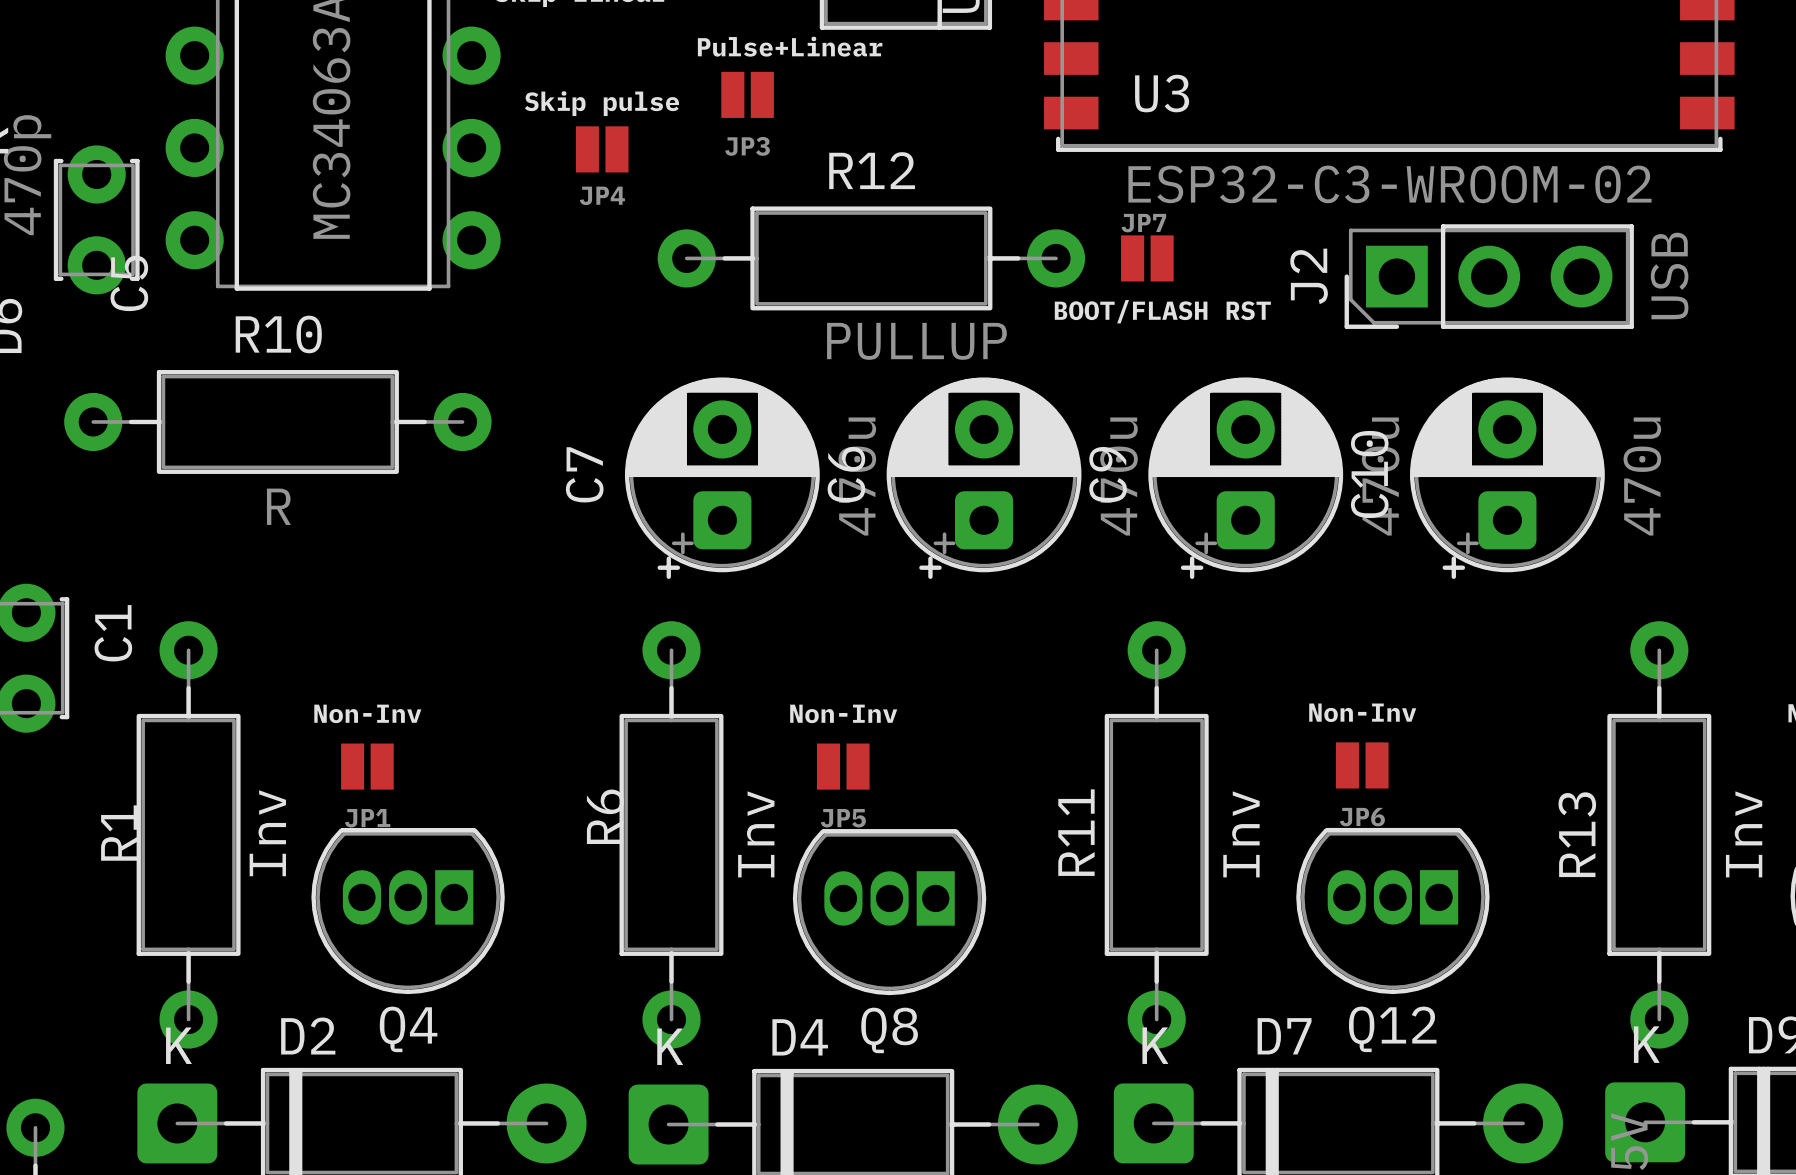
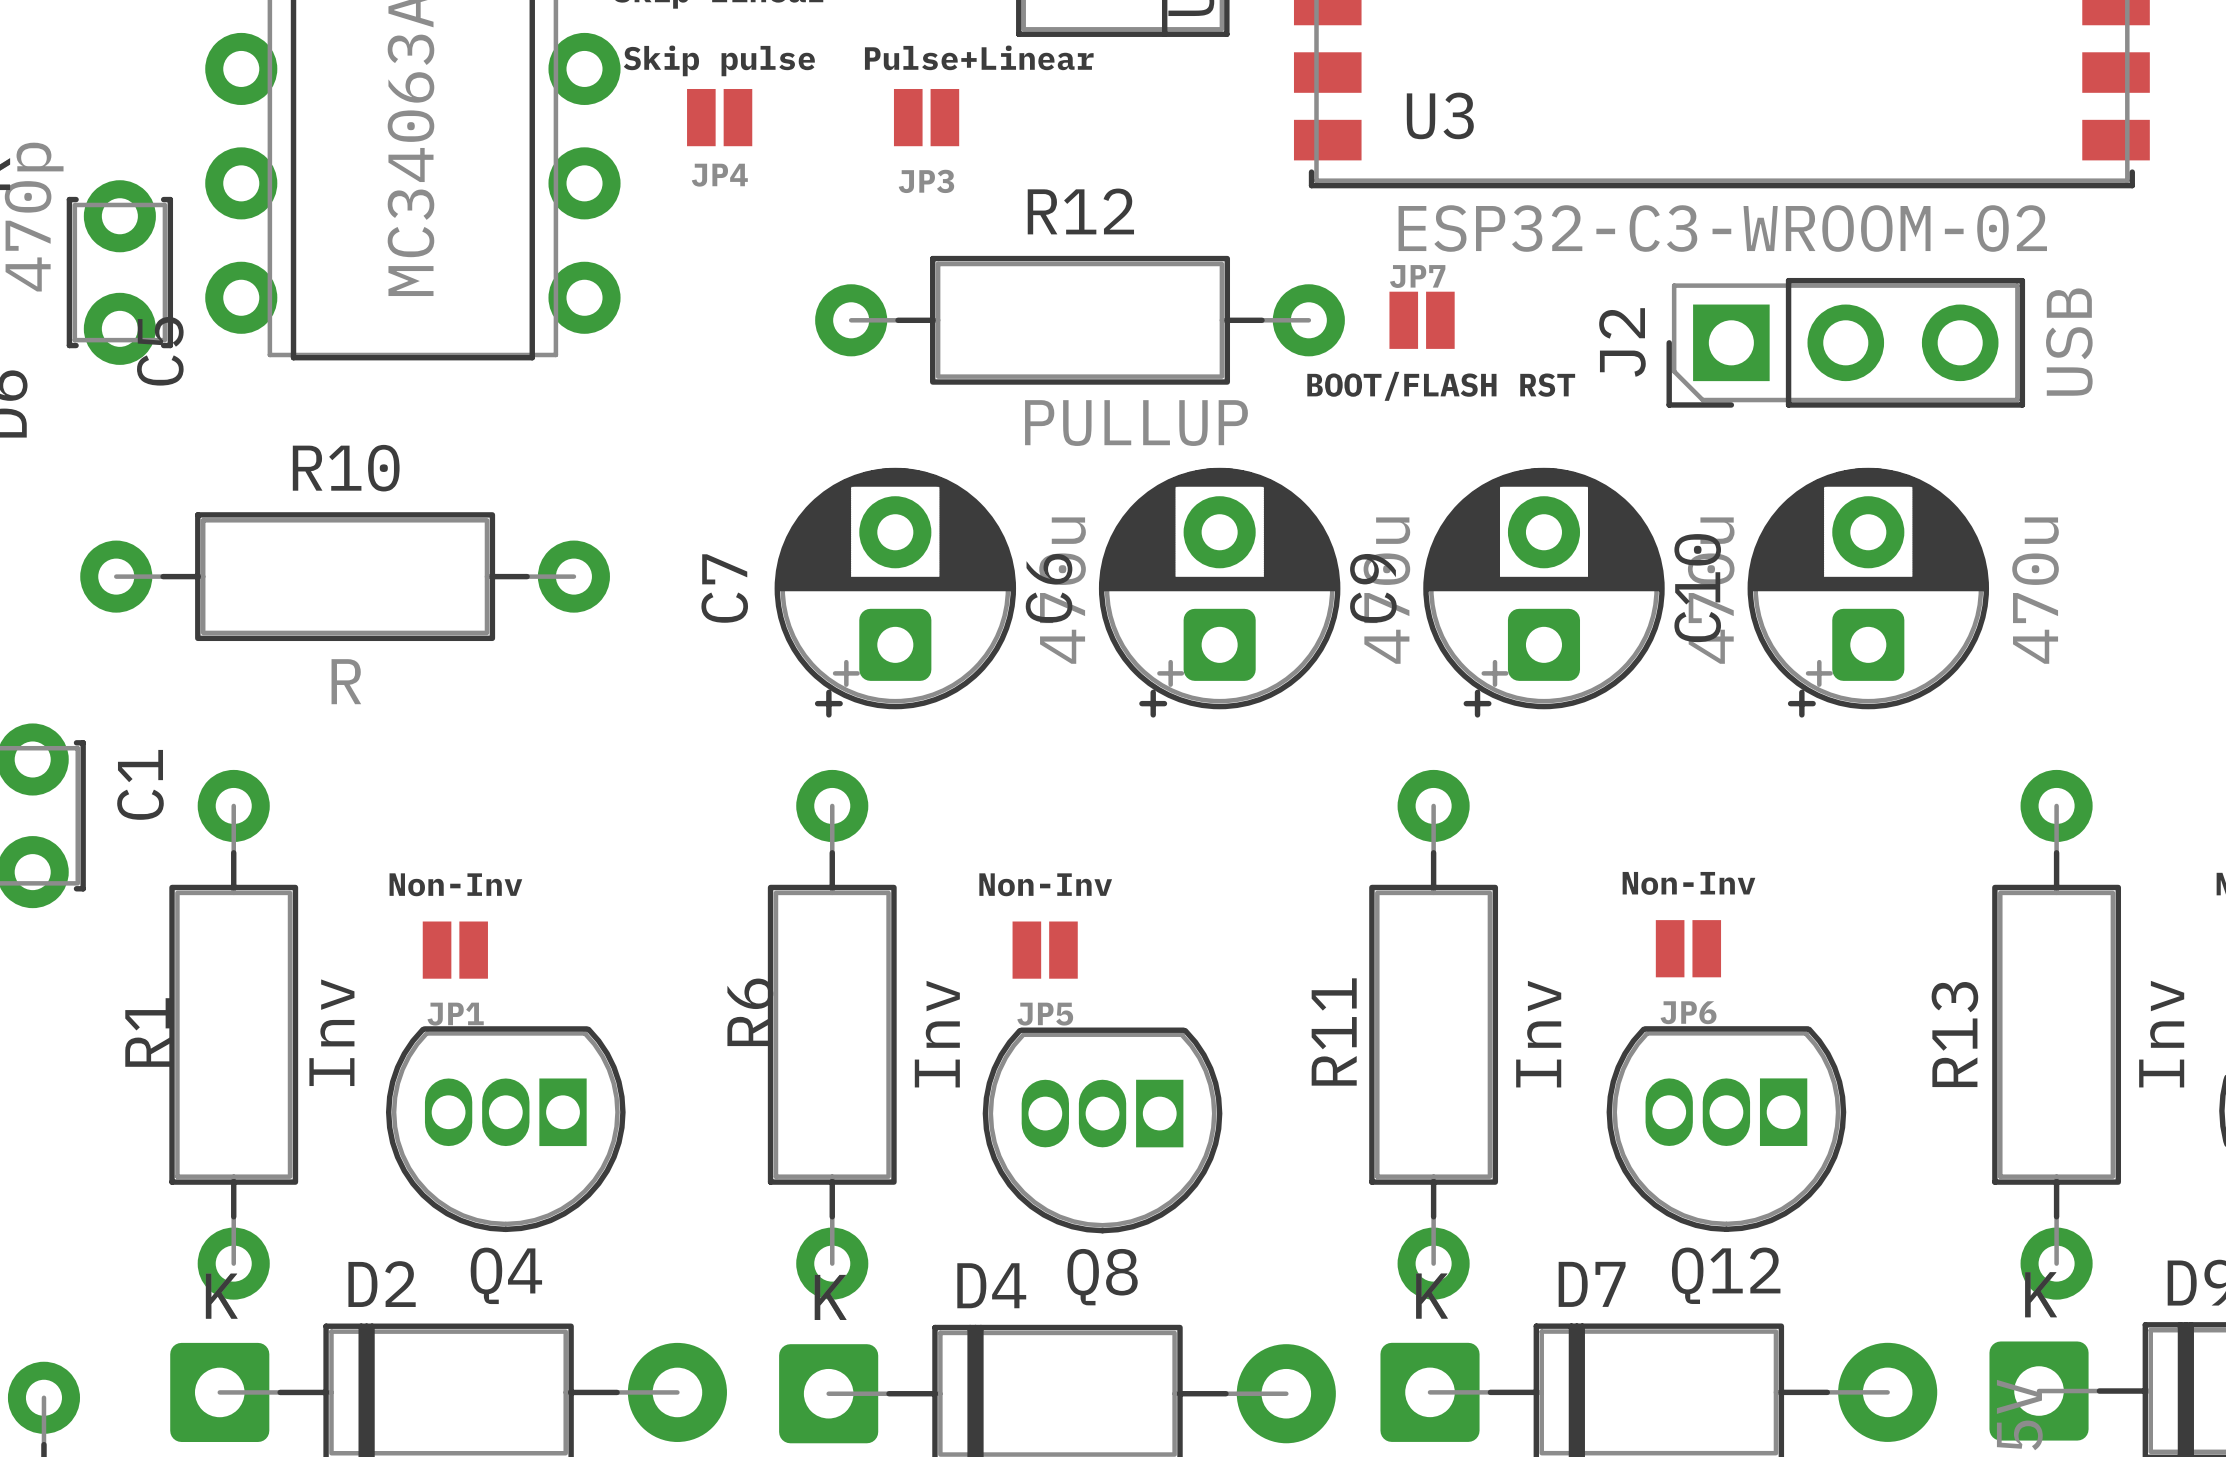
JP4 position: (602, 149) -> (719, 117)
R10 position: (277, 421) -> (345, 576)

